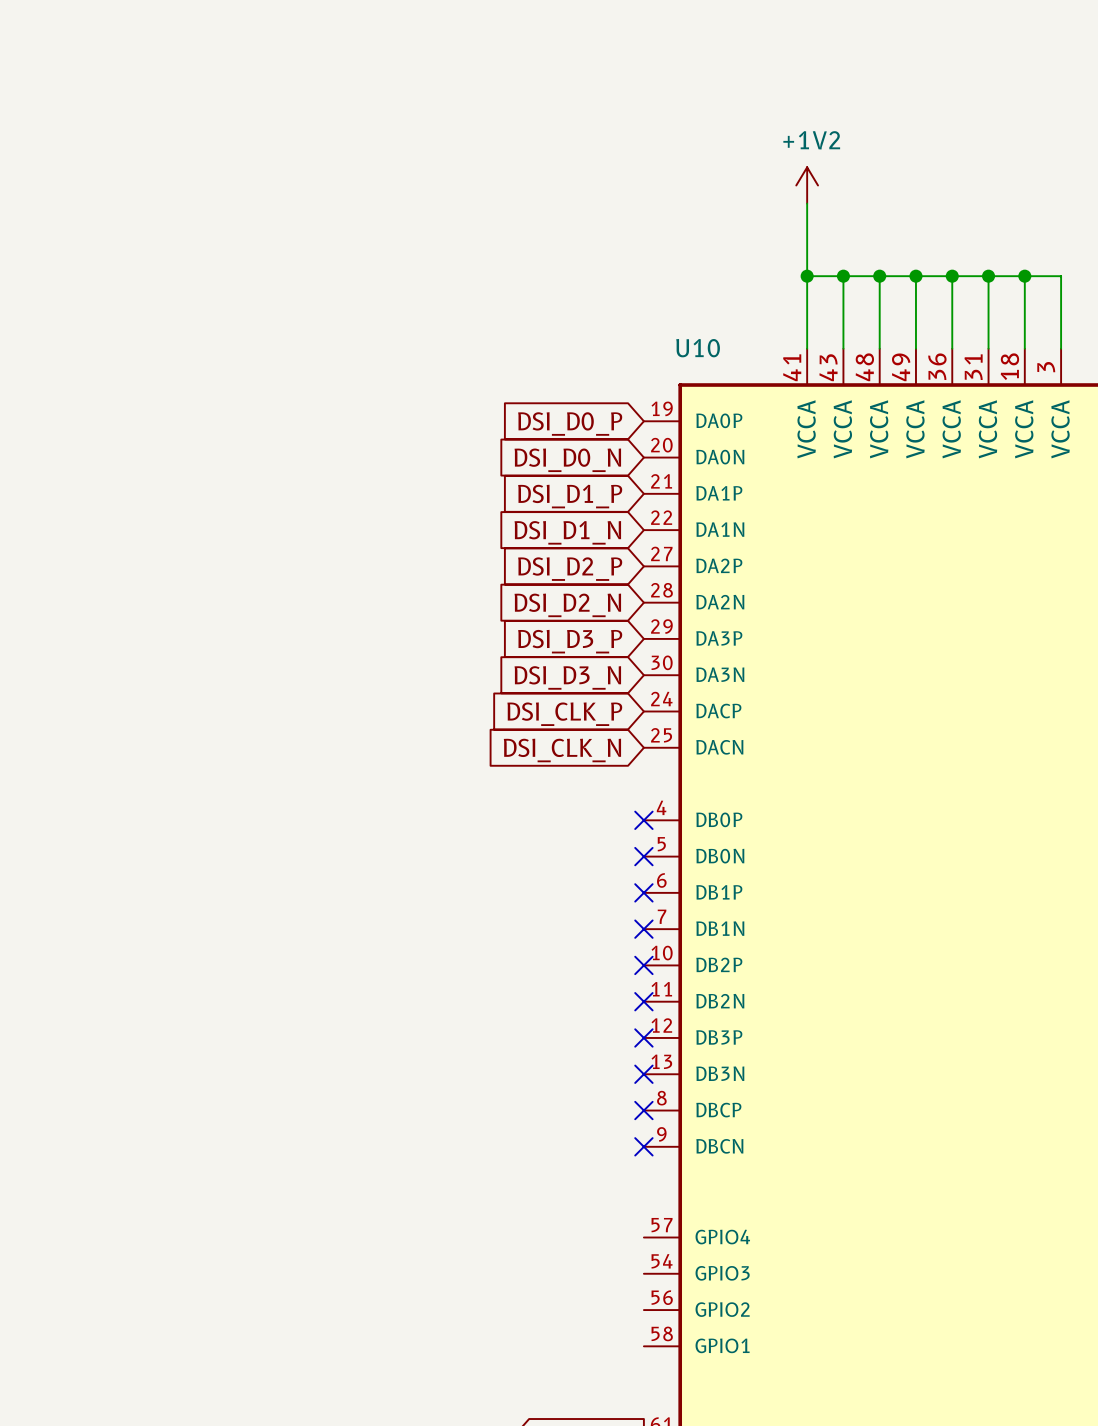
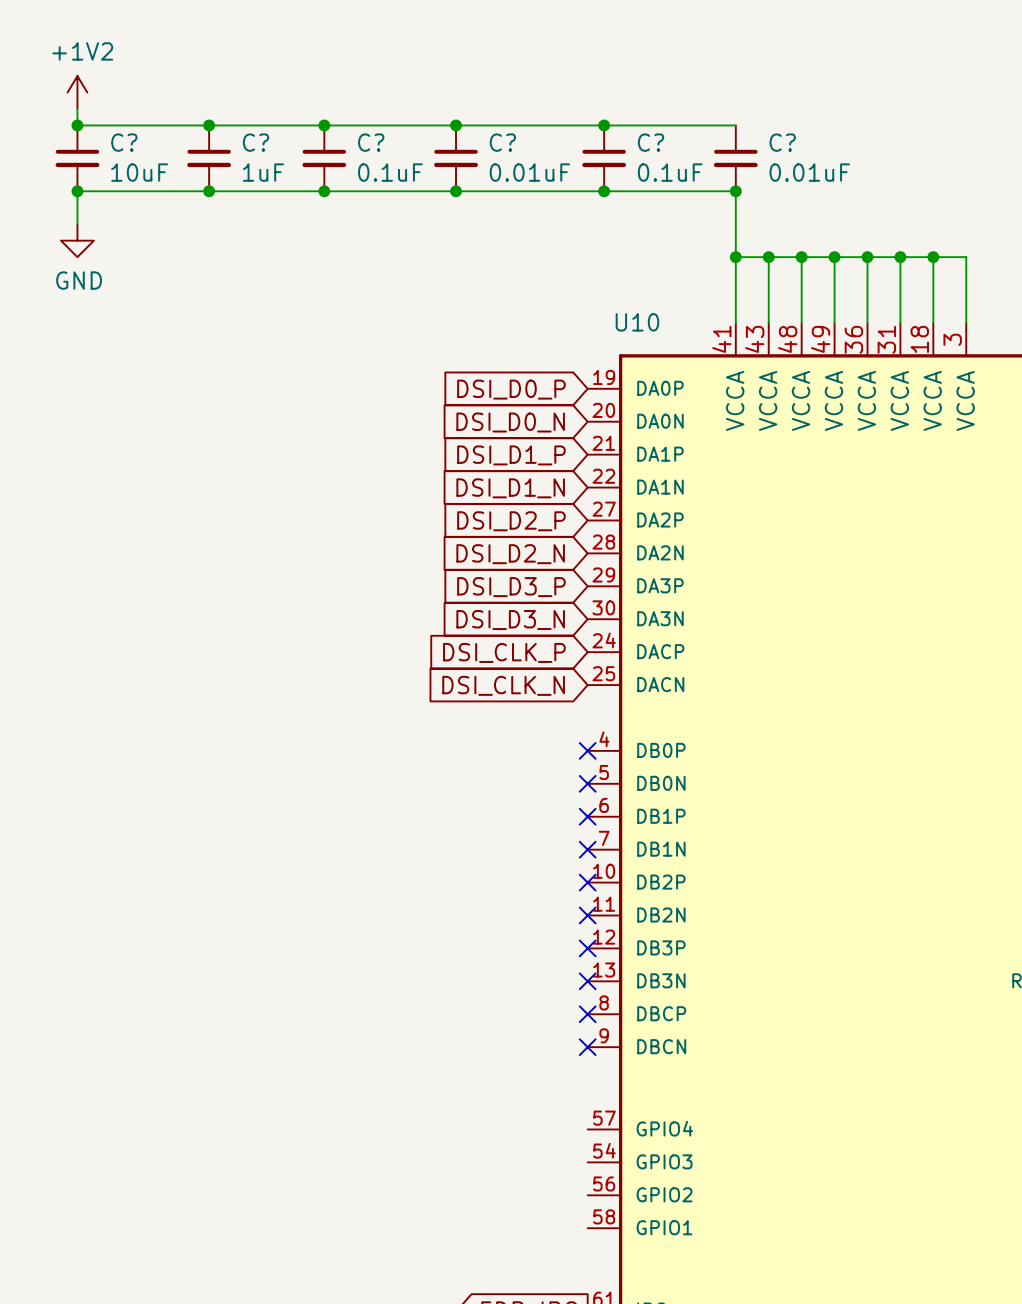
power symbol: none -> +1V2 (77, 92)
wire: none -> (77, 108) (77, 125) (735, 125)
junction: none -> (77, 125)
junction: none -> (209, 125)
junction: none -> (324, 125)
junction: none -> (456, 125)
junction: none -> (604, 125)
C?: none -> 10uF (77, 158)
C?: none -> 1uF (209, 158)
C?: none -> 0.1uF (324, 158)
C?: none -> 0.01uF (456, 158)
C?: none -> 0.1uF (604, 158)
C?: none -> 0.01uF (735, 158)
power symbol: +1V2 (807, 185) -> none
junction: none -> (77, 191)
junction: none -> (209, 191)
junction: none -> (324, 191)
junction: none -> (456, 191)
junction: none -> (604, 191)
wire: none -> (735, 191) (77, 191) (77, 224)
junction: none -> (735, 191)
power symbol: none -> GND (77, 240)

